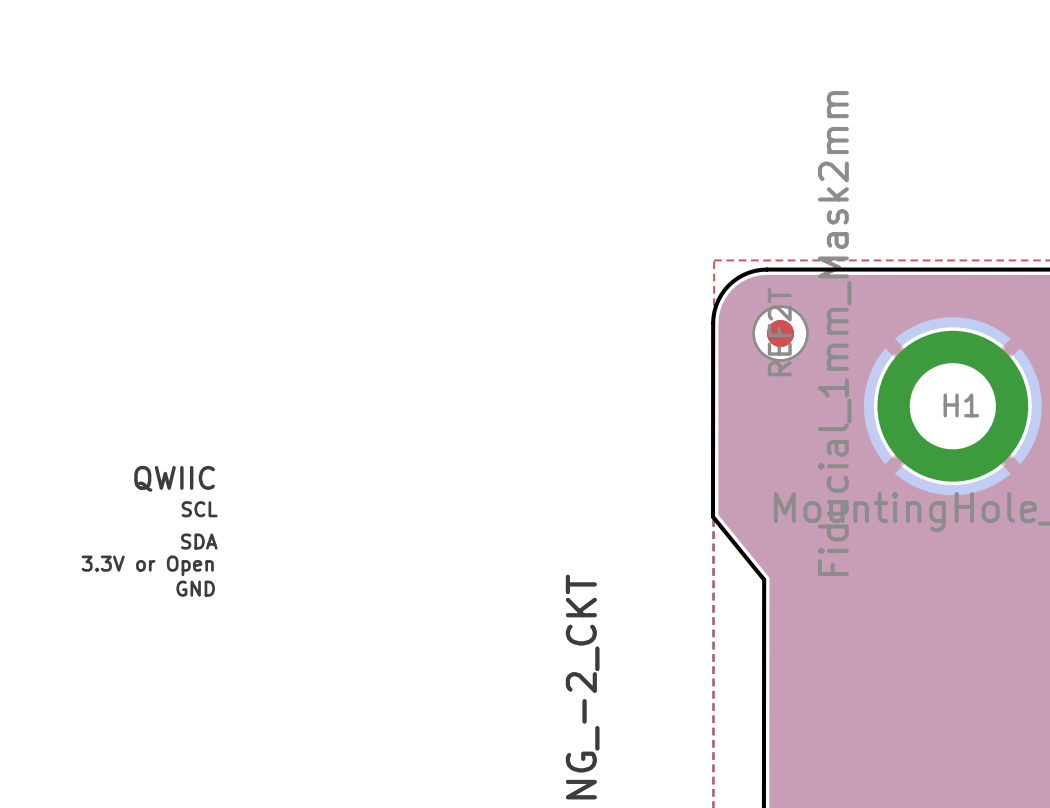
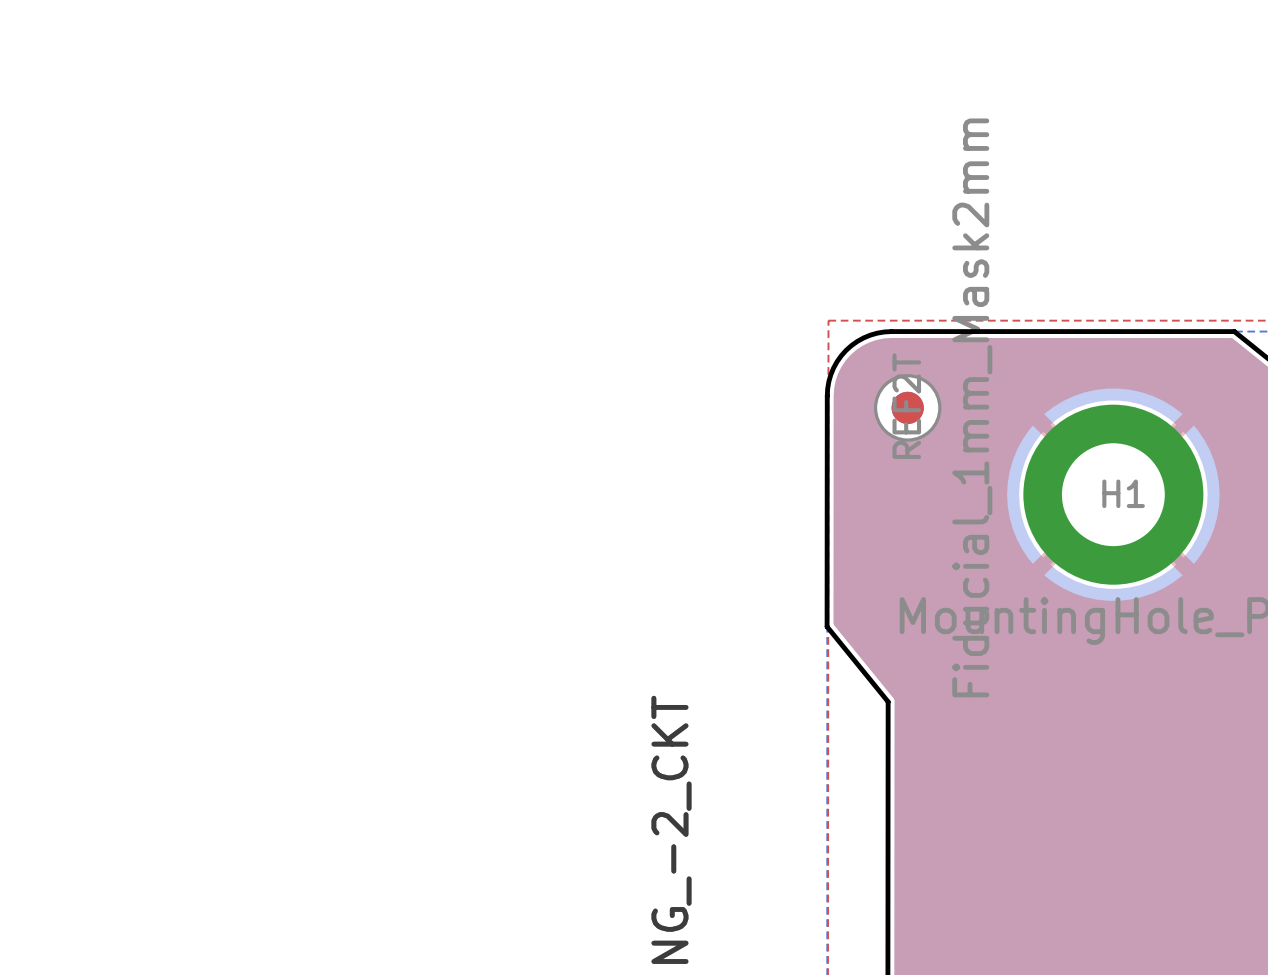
text: QWIIC (174, 478) -> none
text: SCL (199, 509) -> none
text: SDA (199, 541) -> none
text: 3.3V or Open (147, 565) -> none
text: GND (195, 588) -> none

